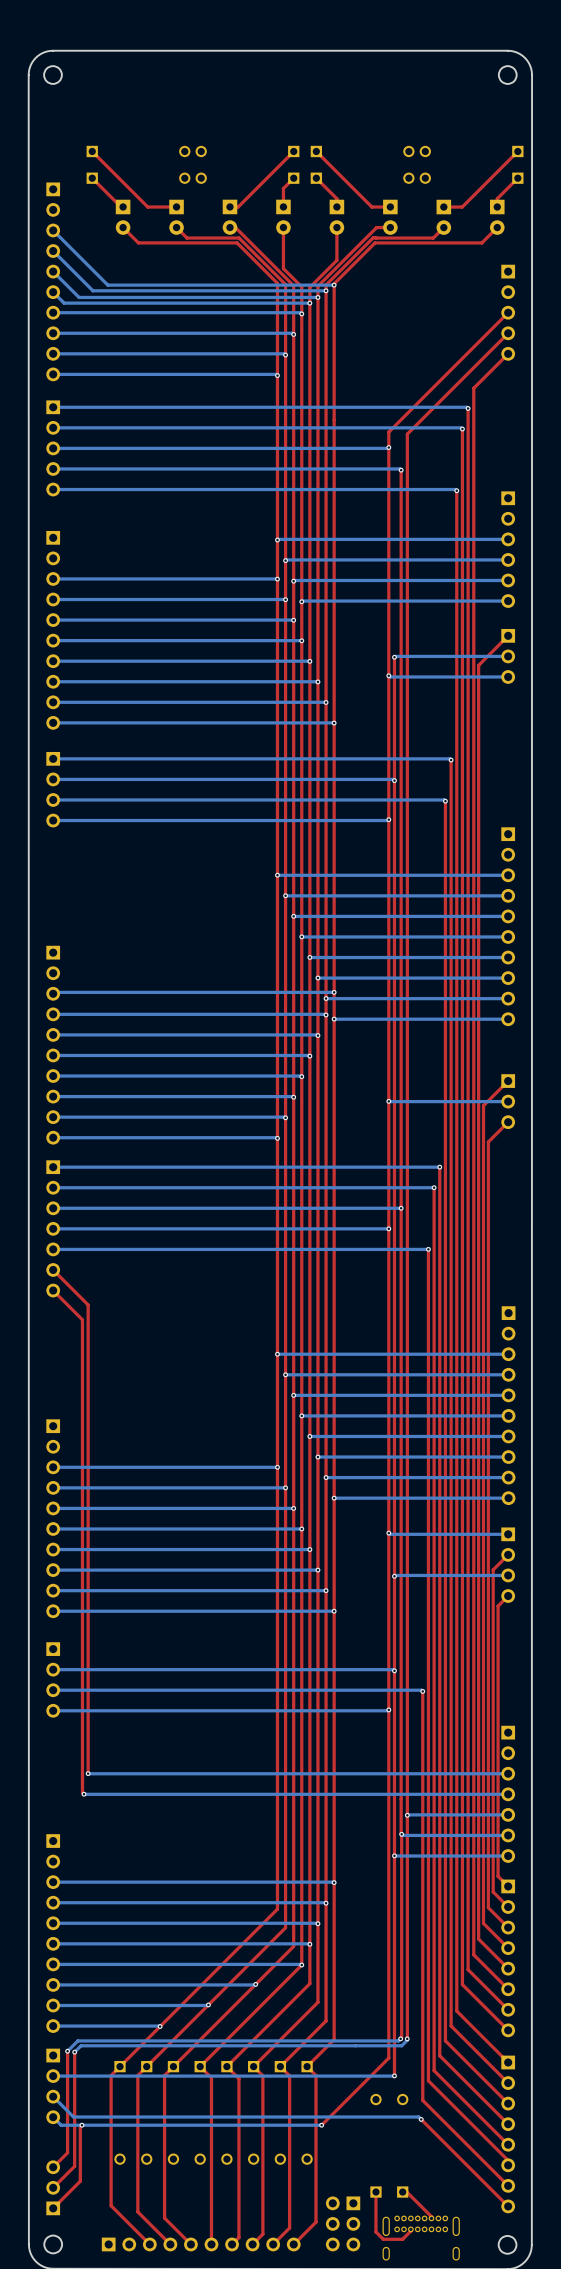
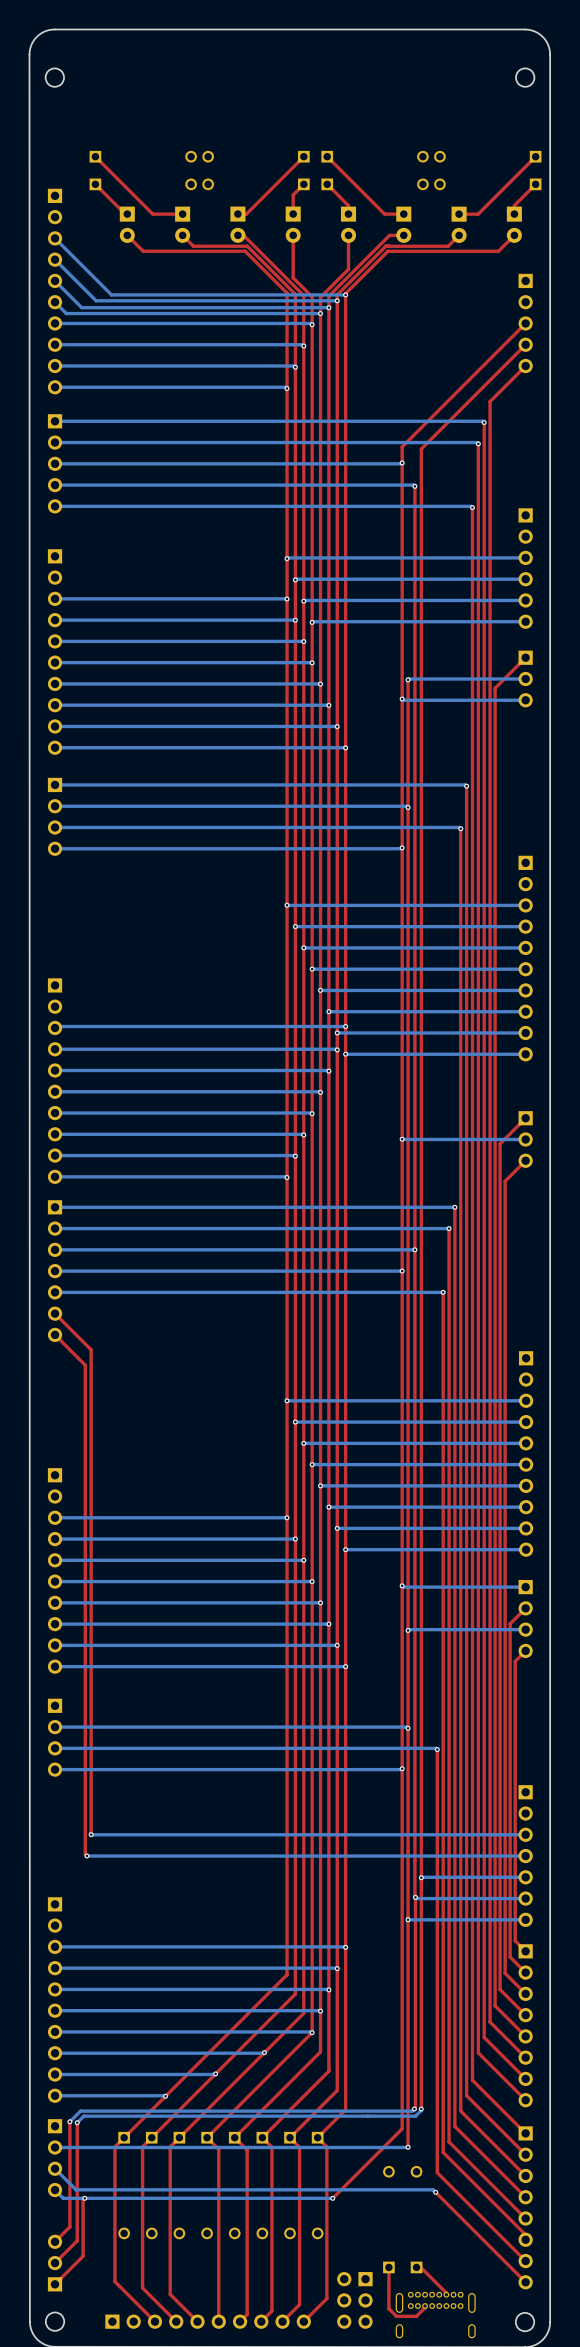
board edge: (28, 2244) (29, 69) (37, 56) (52, 50) (507, 50) (517, 52) (524, 57) (530, 65) (532, 75) (531, 2244) -> (29, 2321) (30, 49) (38, 34) (54, 29) (525, 29) (534, 31) (542, 36) (548, 45) (550, 54) (550, 2322)

